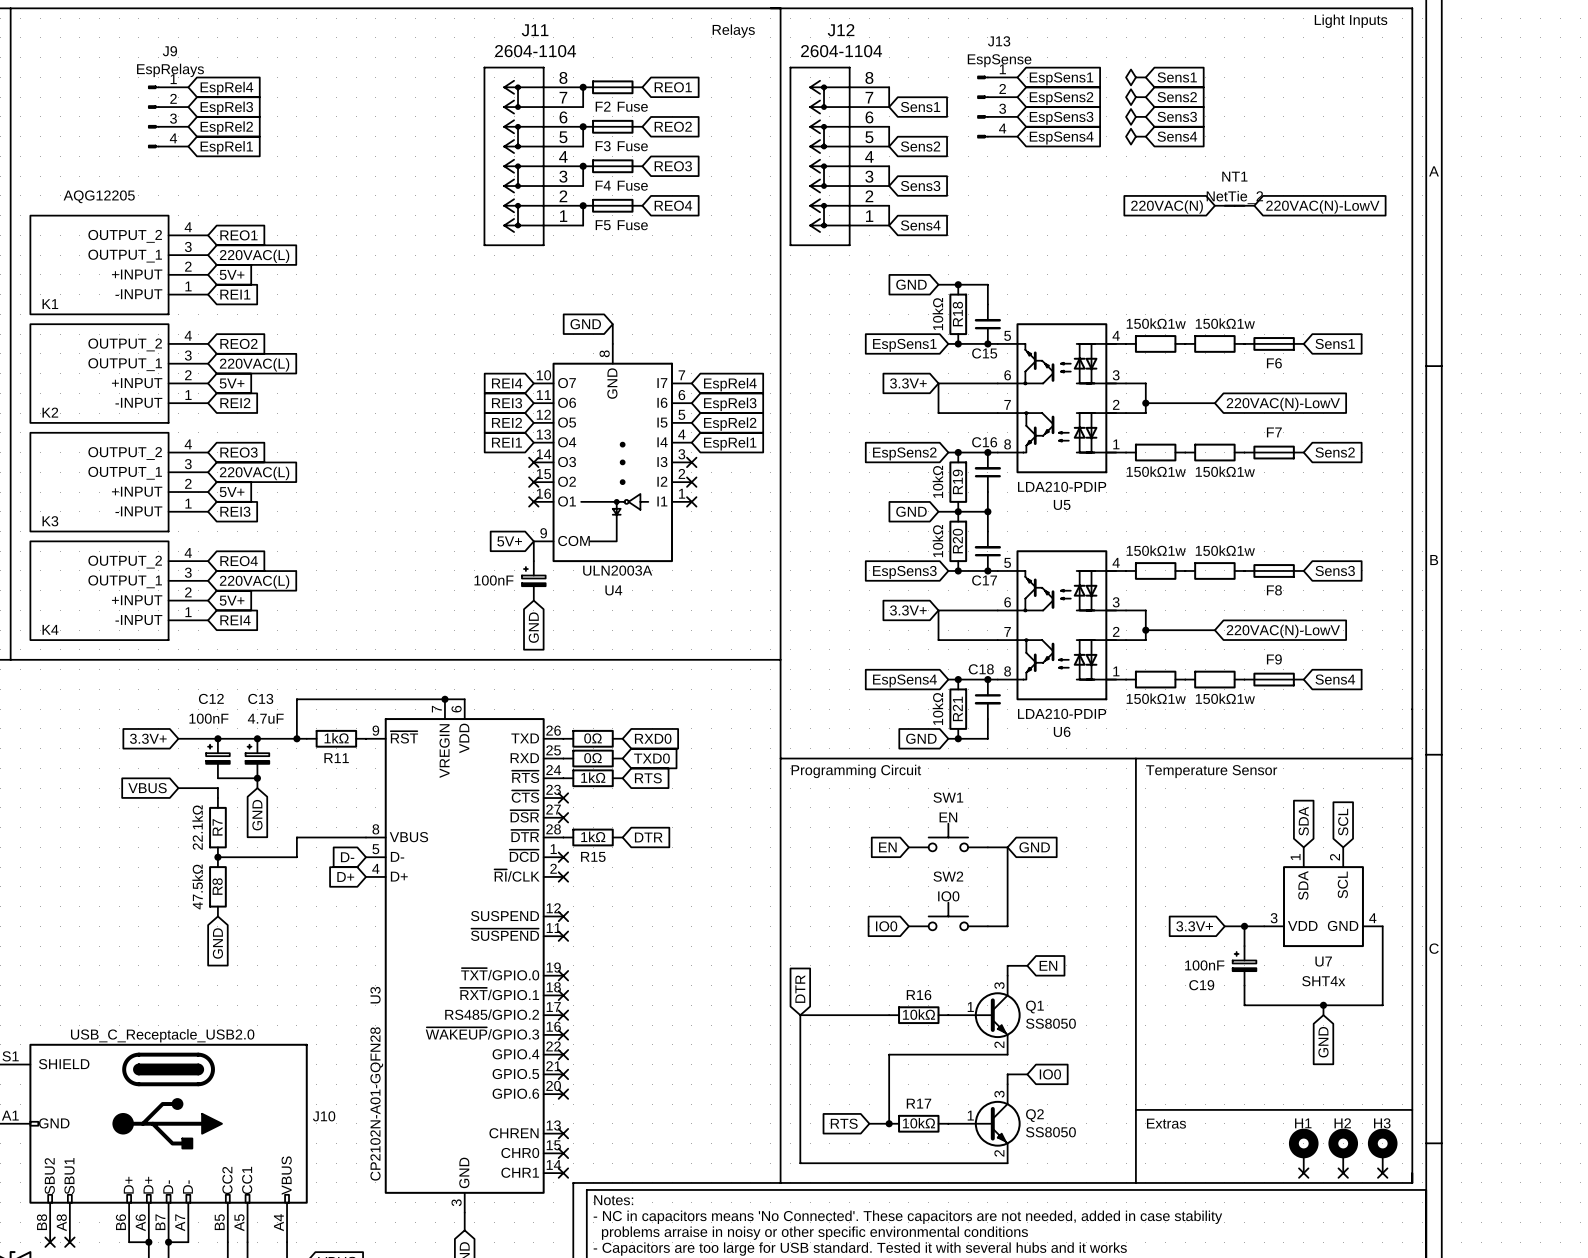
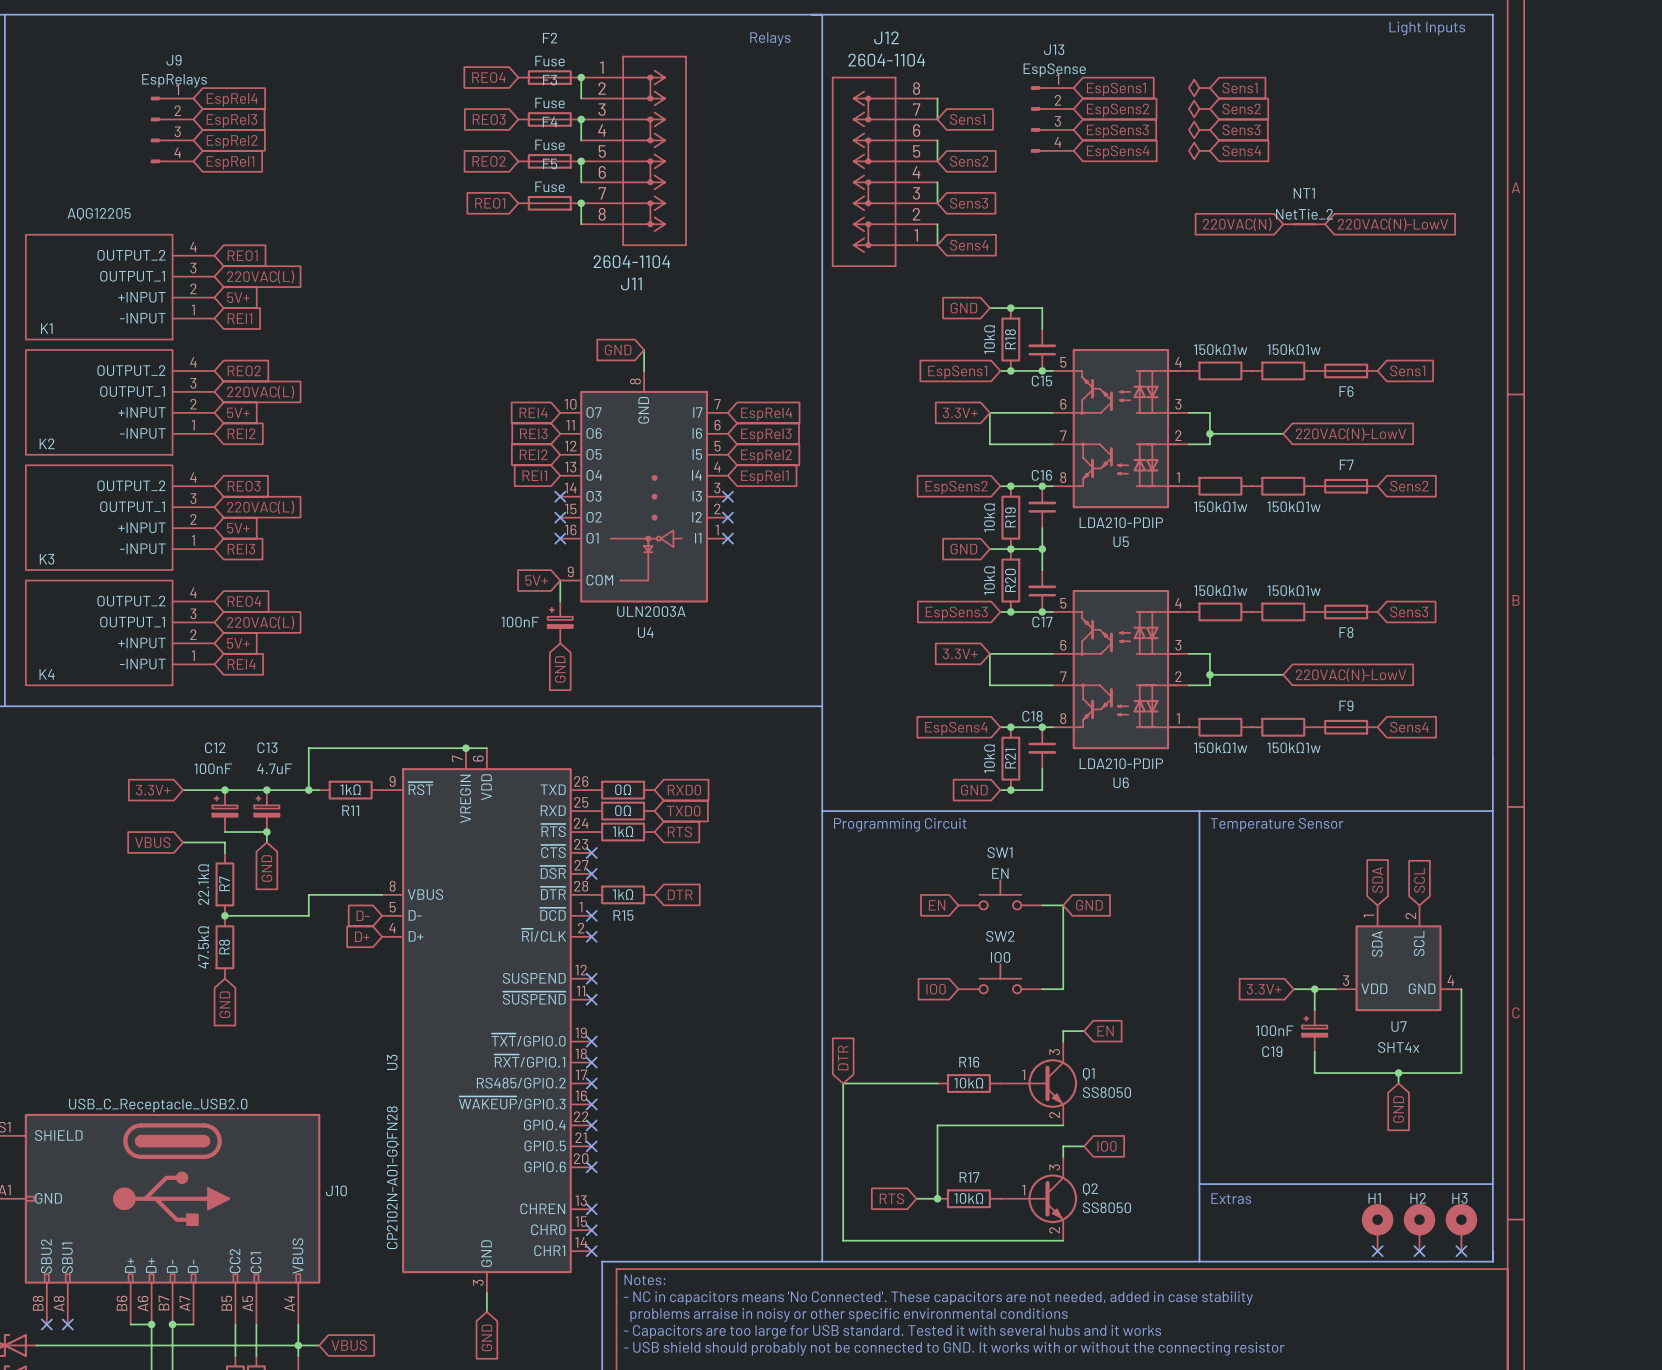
global label: none -> REO4 (488, 77)
junction: none -> (581, 77)
wire: (583, 87) (583, 107) -> (581, 77) (581, 98)
junction: (583, 87) -> none
F2 position: (612, 87) -> (549, 77)
global label rotation: 0° (673, 87) -> 180° (490, 203)
global label position: REO1 (673, 87) -> REO1 (490, 203)
F2 name position: F2 (603, 106) -> F2 (550, 38)
F2 value position: Fuse (632, 106) -> Fuse (550, 61)
junction: none -> (581, 119)
wire: (583, 126) (583, 146) -> (581, 119) (581, 140)
junction: (583, 126) -> none
F3 position: (612, 126) -> (549, 119)
global label rotation: 0° (673, 126) -> 180° (489, 161)
global label position: REO2 (673, 126) -> REO2 (489, 161)
junction: none -> (581, 161)
F3 name position: F3 (603, 146) -> F3 (550, 80)
F3 value position: Fuse (632, 146) -> Fuse (550, 103)
J11 rotation: 0° (514, 156) -> 180° (654, 150)
wire: (583, 166) (583, 186) -> (581, 161) (581, 182)
junction: (583, 166) -> none
F4 position: (612, 166) -> (549, 161)
global label rotation: 0° (673, 166) -> 180° (489, 119)
global label position: REO3 (673, 166) -> REO3 (489, 119)
F4 name position: F4 (603, 185) -> F4 (550, 121)
F4 value position: Fuse (632, 185) -> Fuse (550, 144)
junction: none -> (581, 203)
wire: (583, 205) (583, 225) -> (581, 203) (581, 224)
junction: (583, 205) -> none
F5 position: (612, 205) -> (549, 203)
global label: REO4 (673, 205) -> none
F5 name position: F5 (603, 225) -> F5 (550, 163)
F5 value position: Fuse (632, 225) -> Fuse (550, 186)

